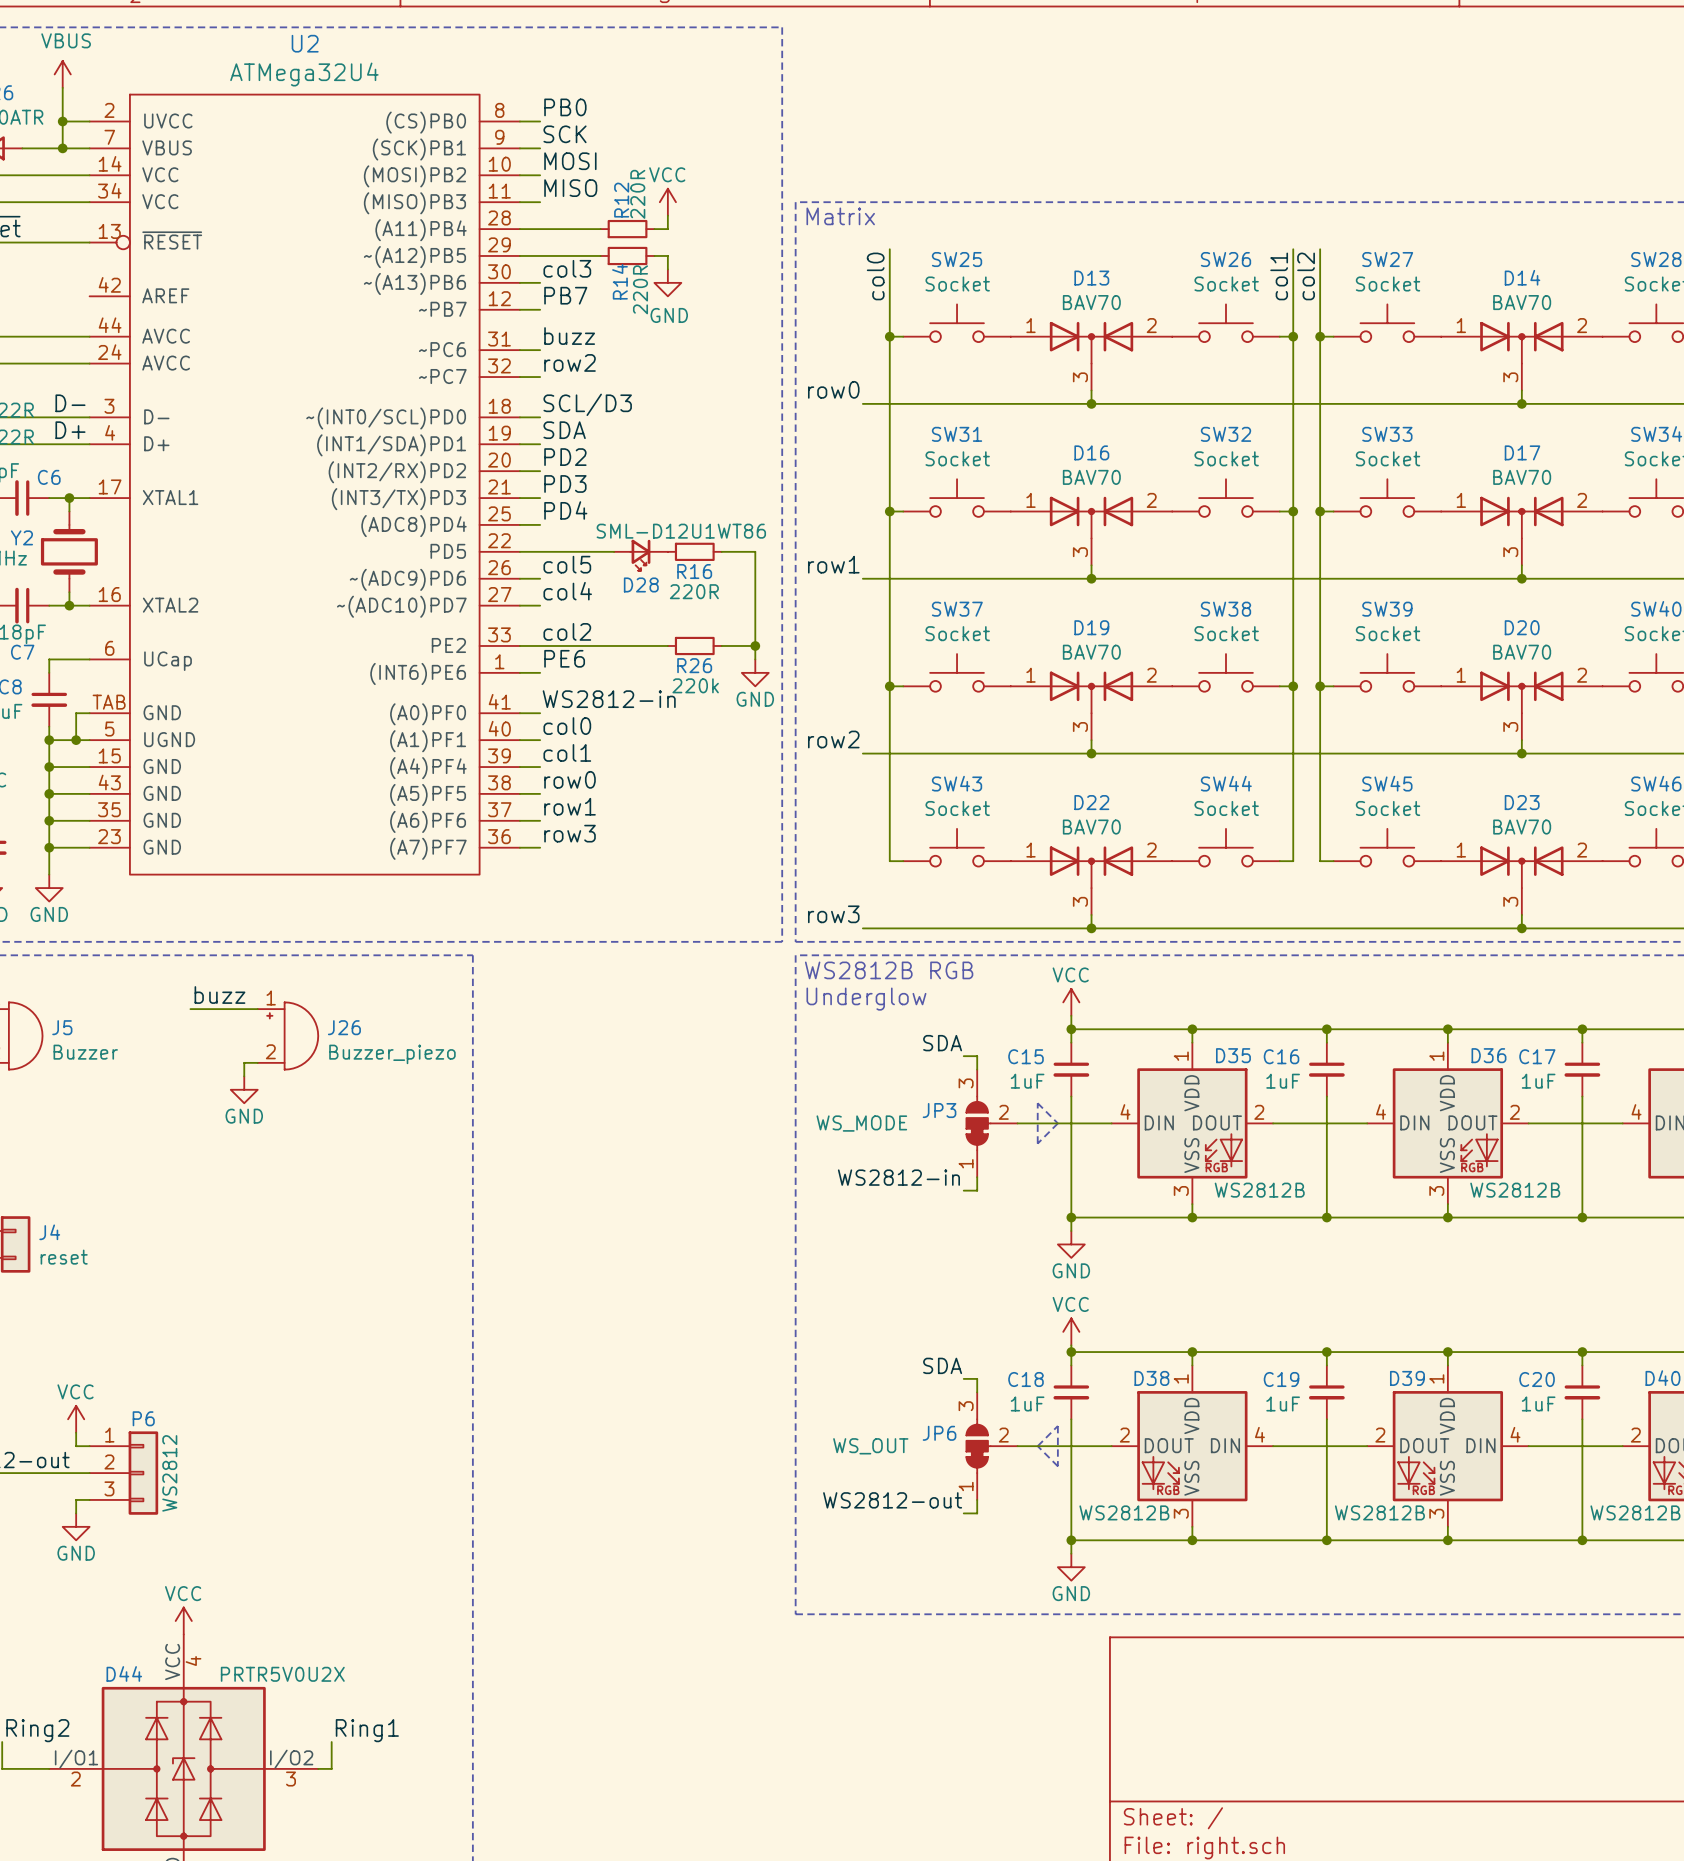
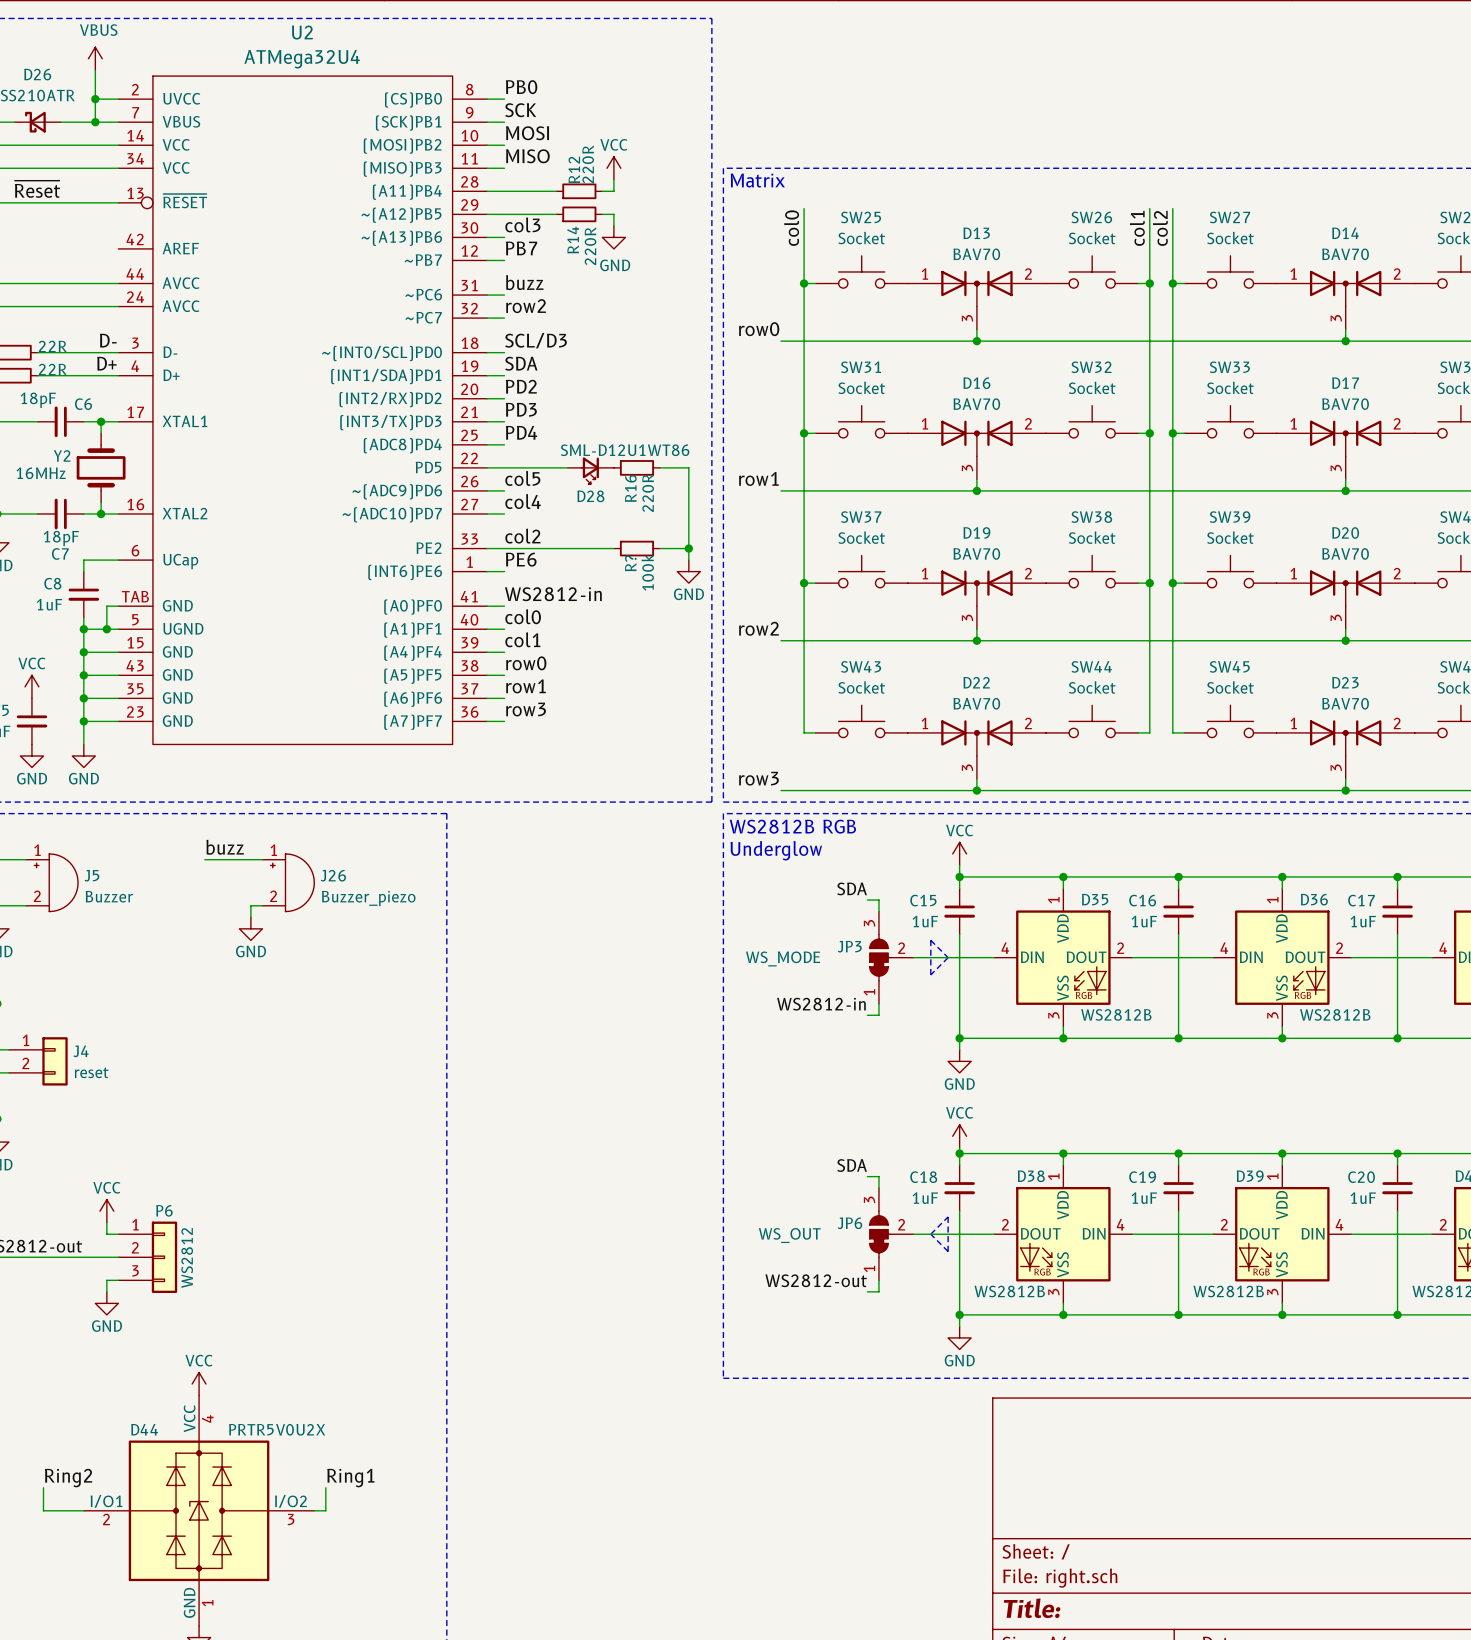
R16 name rotation: 0° (694, 571) -> 90° counterclockwise (630, 488)
R16 value rotation: 0° (694, 591) -> 90° counterclockwise (648, 493)
R26 name: R26 (694, 665) -> R? (630, 563)
R26 value: 220k (695, 685) -> 100k (647, 572)

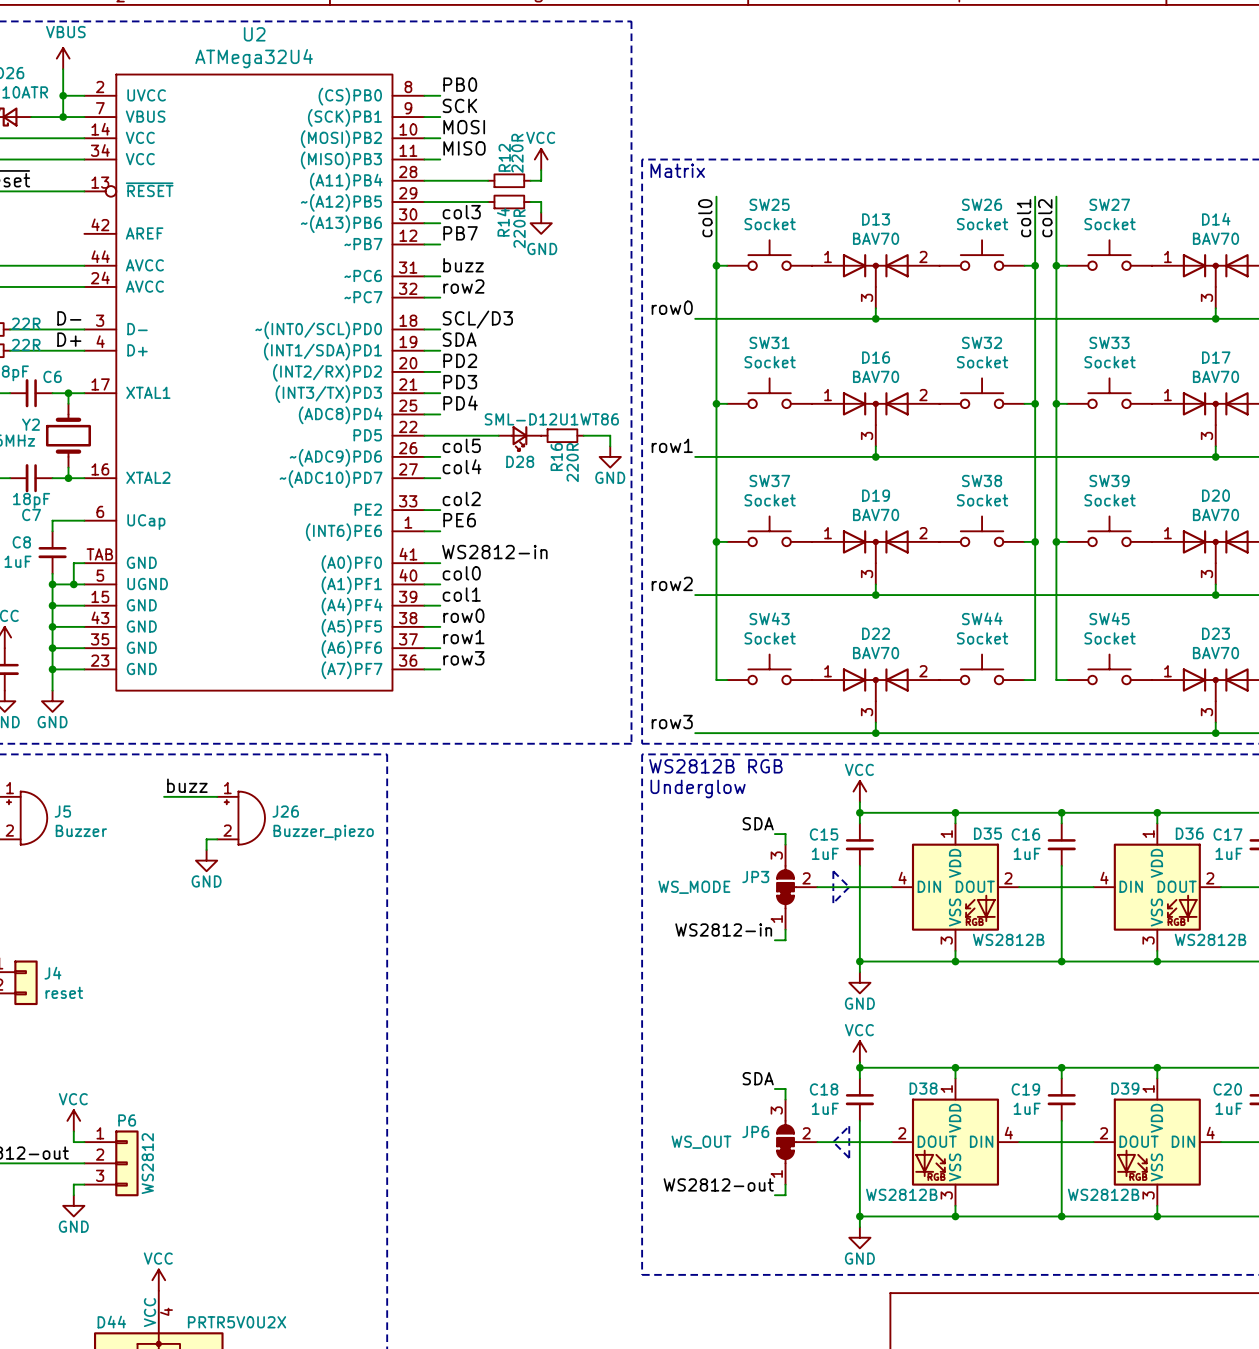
wire: (688, 479) (688, 560) -> none
wire: (504, 548) (613, 548) -> none
R?: 100k (636, 548) -> none
wire: (660, 548) (688, 548) -> none
junction: (688, 548) -> none
power symbol position: GND (688, 571) -> GND (610, 456)

